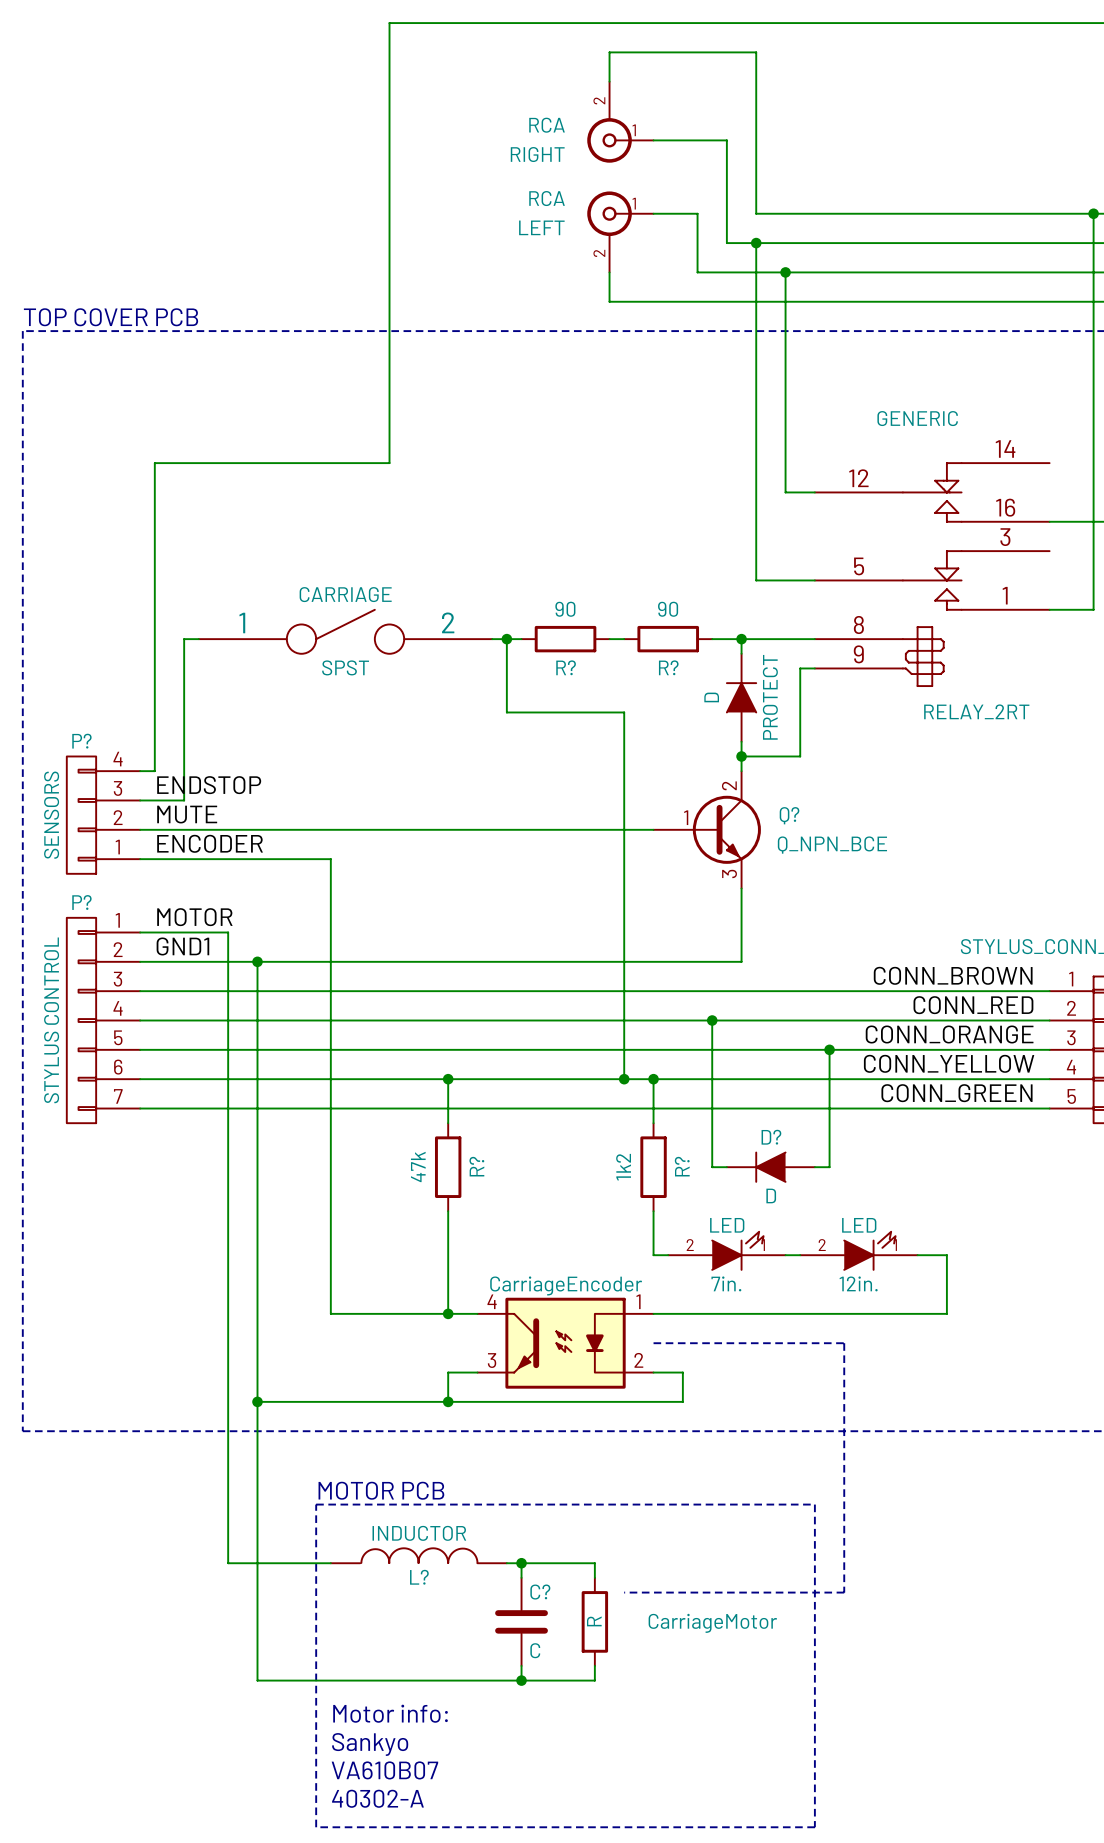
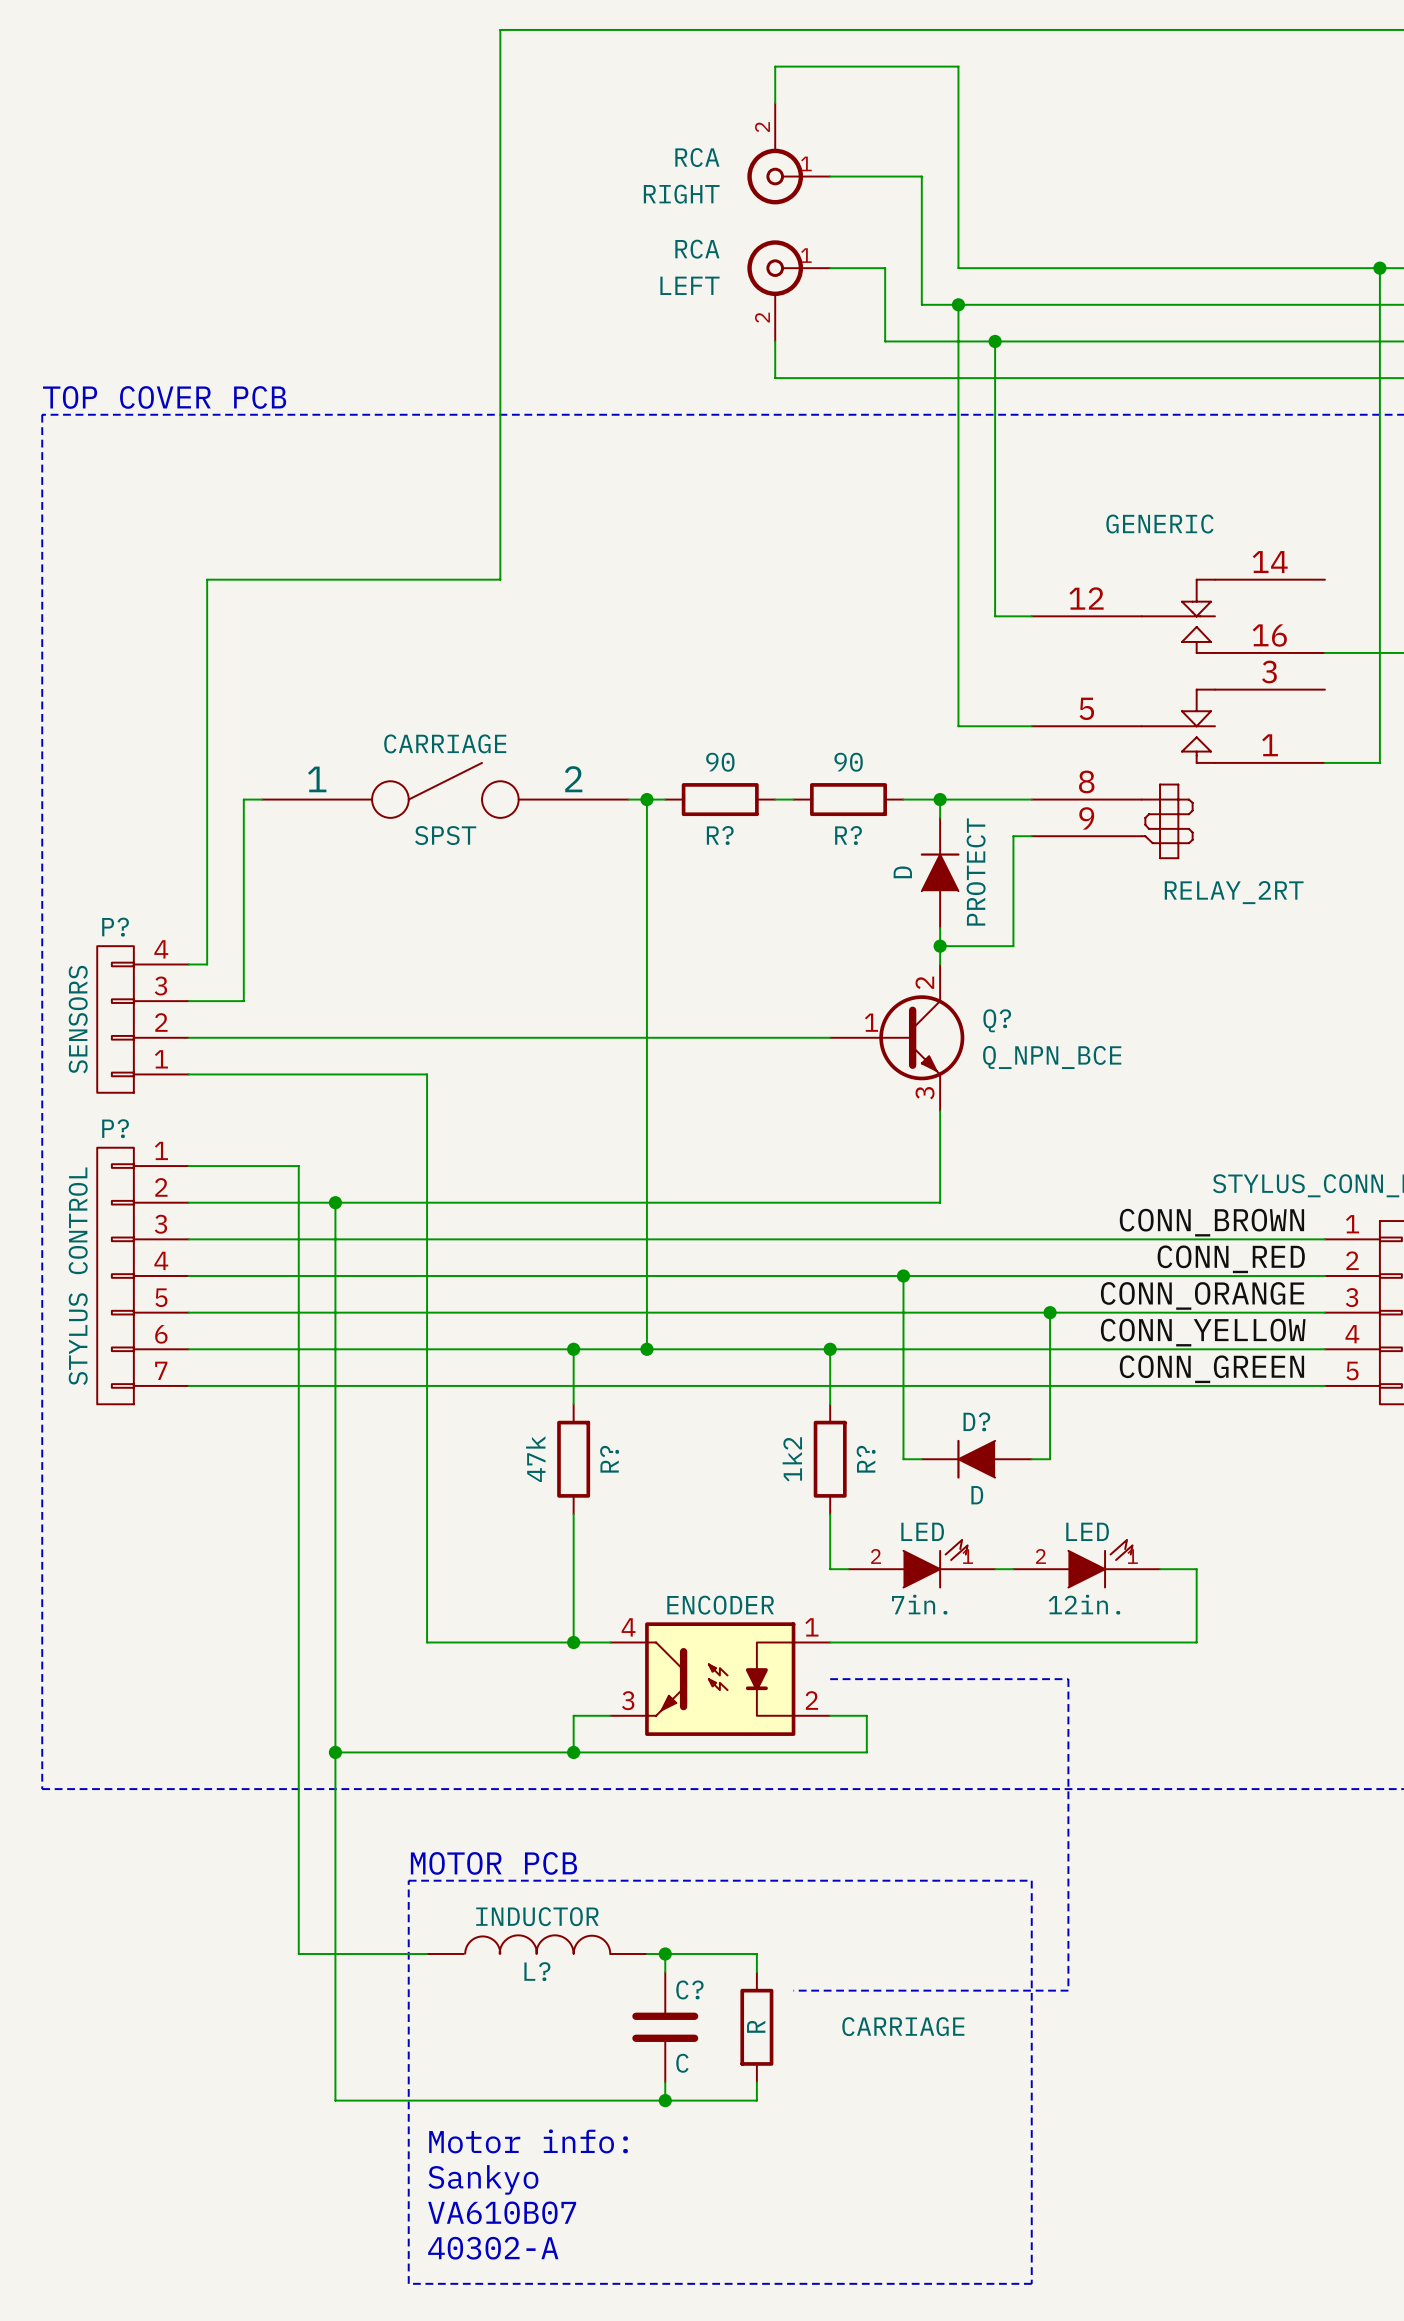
wire: (506, 712) (624, 712) (624, 1079) -> (646, 891) (646, 1349)
label: ENDSTOP (209, 785) -> none
label: MUTE (187, 814) -> none
label: ENCODER (210, 843) -> none
label: MOTOR (194, 917) -> none
label: GND1 (182, 946) -> none
junction: none -> (646, 1349)
junction: (624, 1079) -> none
CarriageEncoder name: CarriageEncoder (566, 1285) -> ENCODER (720, 1605)
CarriageMotor name: CarriageMotor (712, 1623) -> CARRIAGE (903, 2026)

